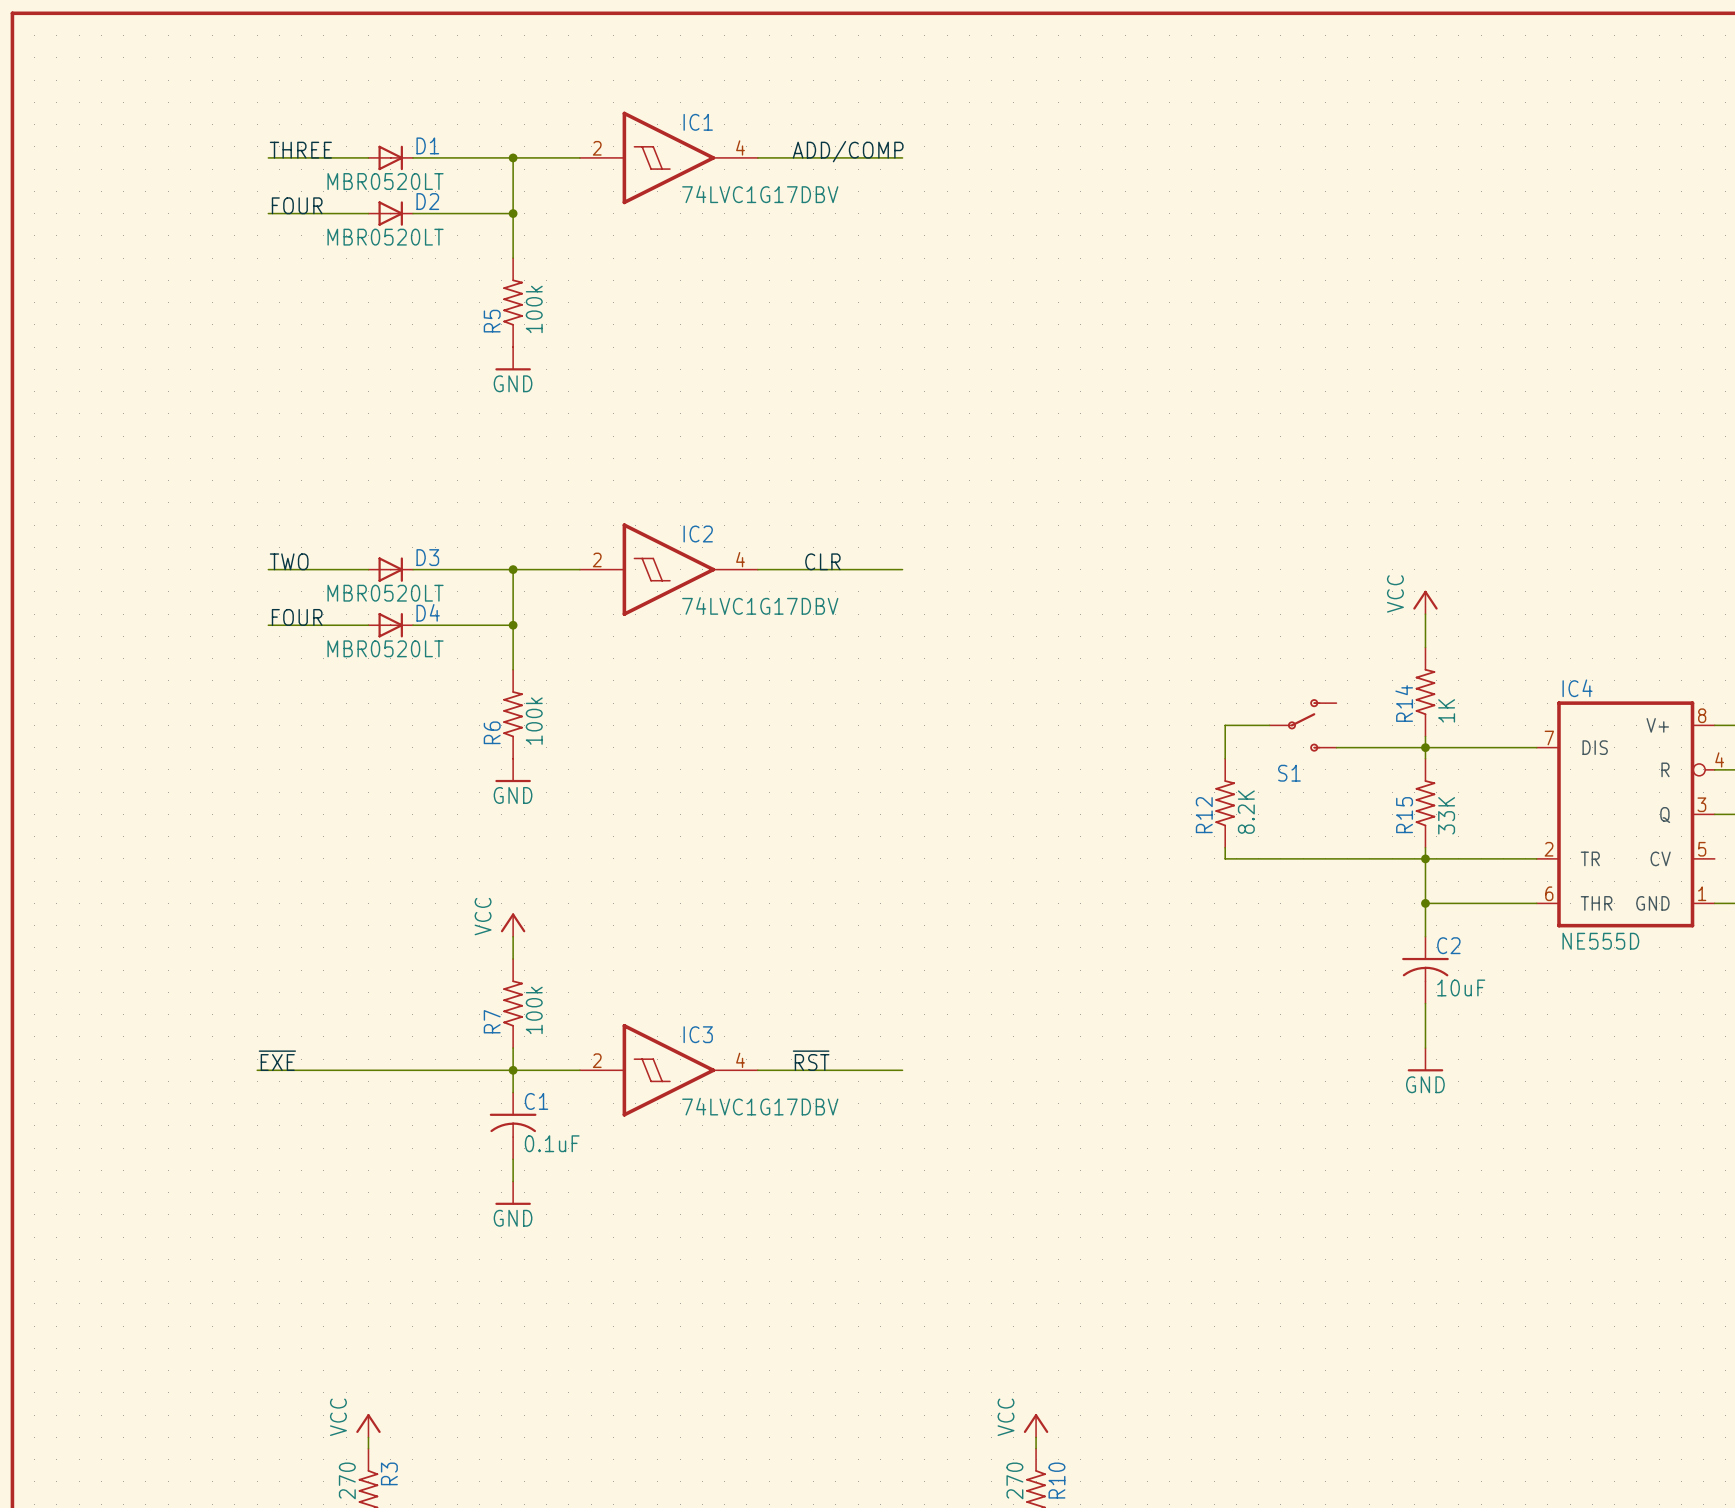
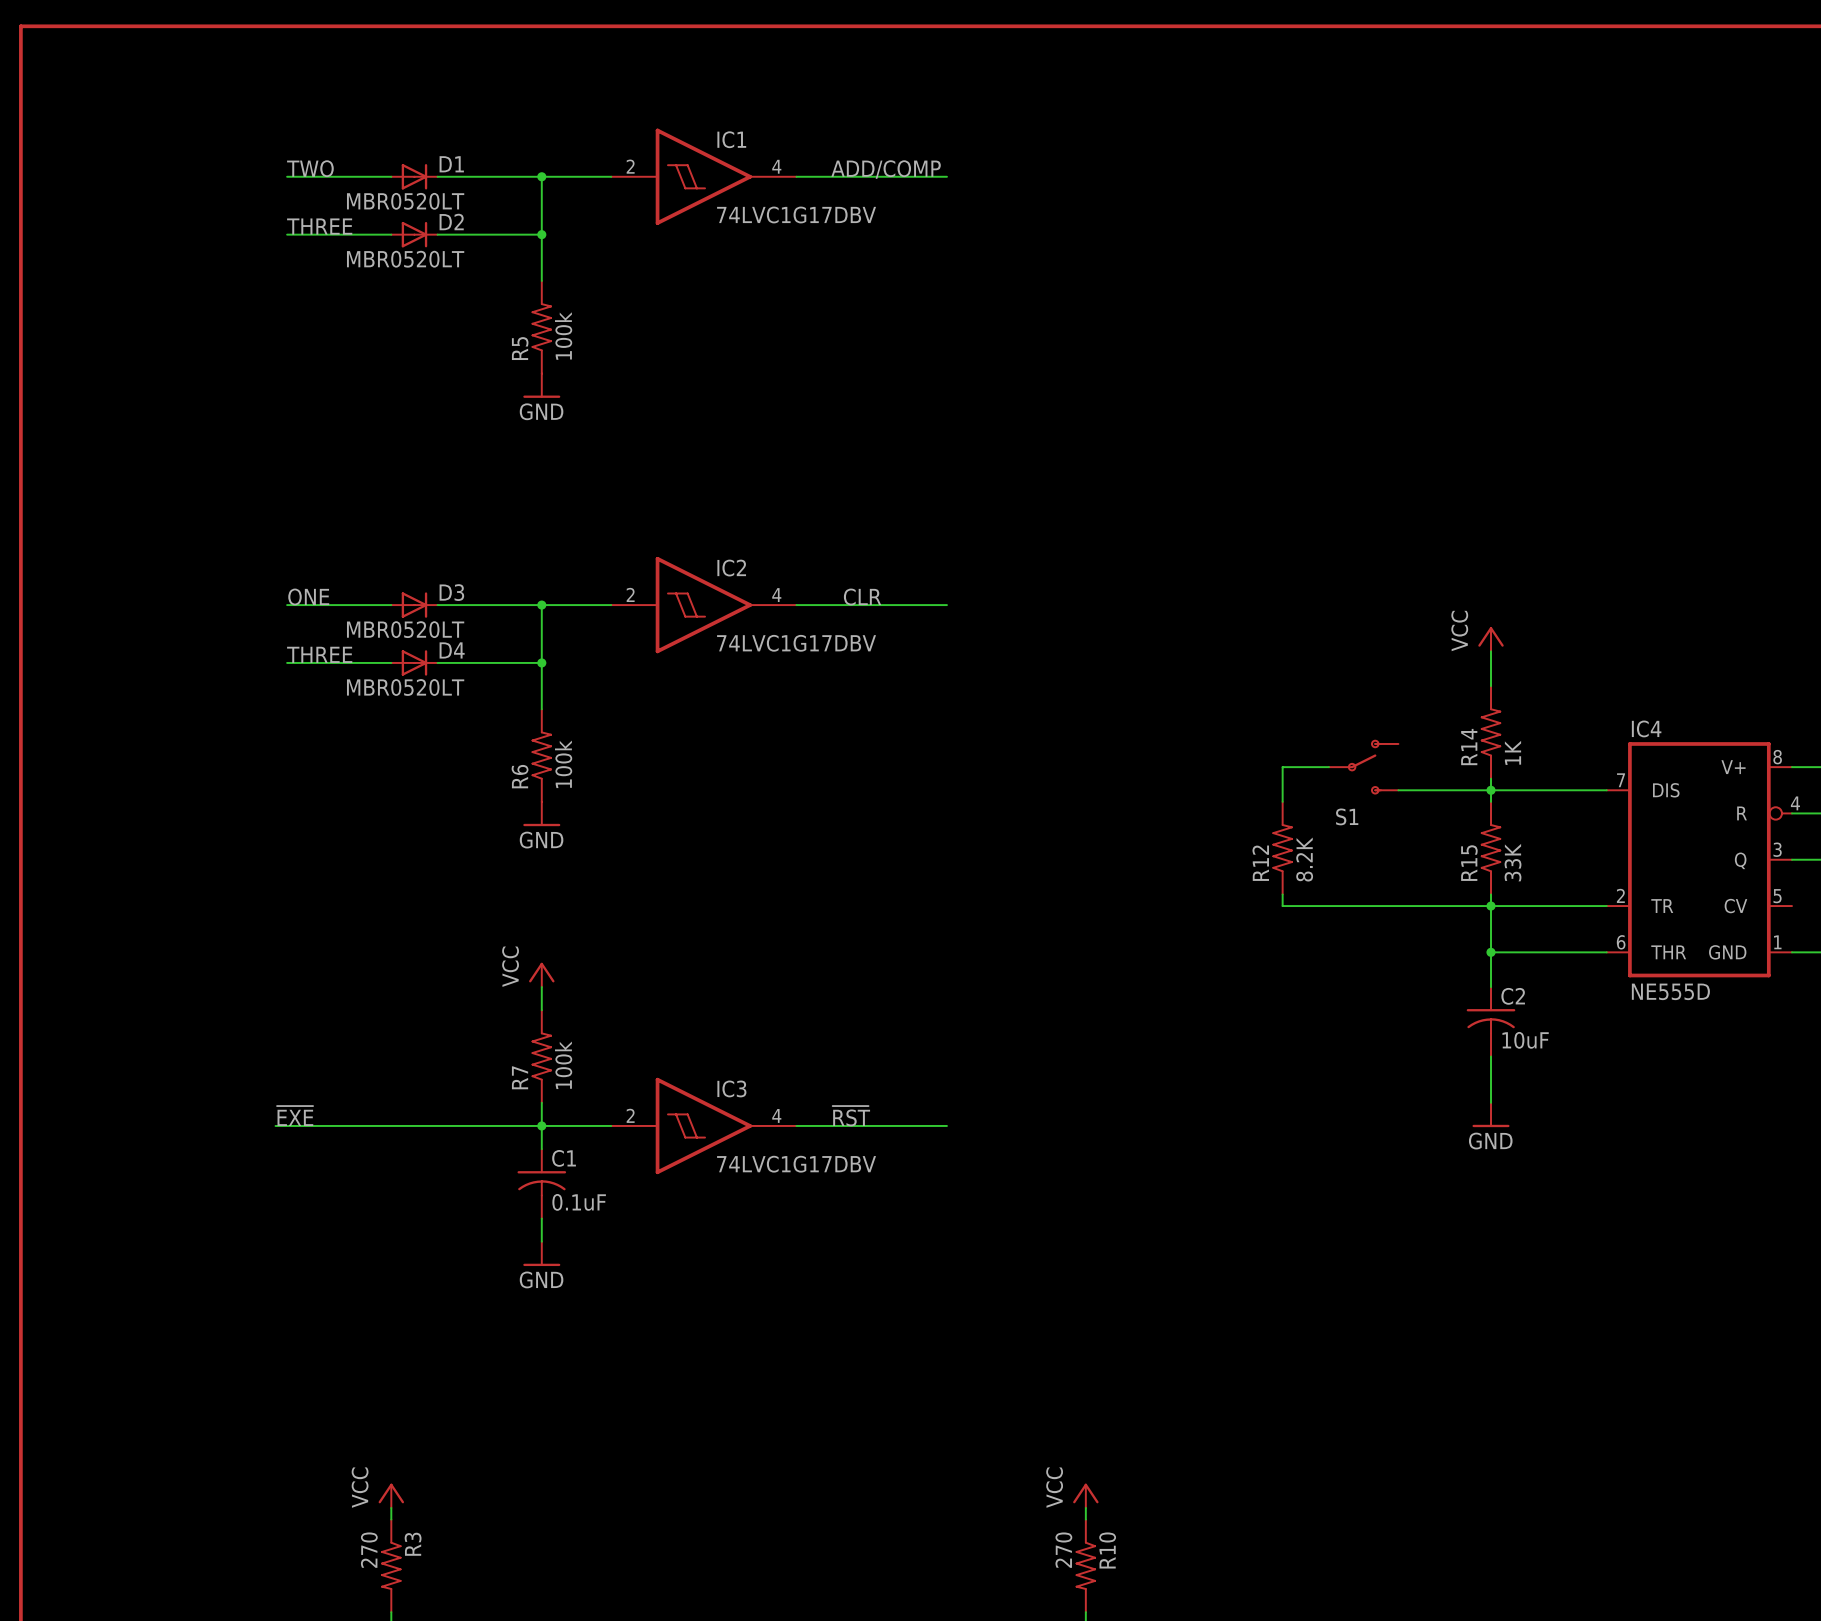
label: THREE (300, 150) -> TWO (310, 168)
label: FOUR (297, 205) -> THREE (319, 226)
label: TWO (289, 561) -> ONE (308, 596)
label: FOUR (297, 617) -> THREE (319, 654)

